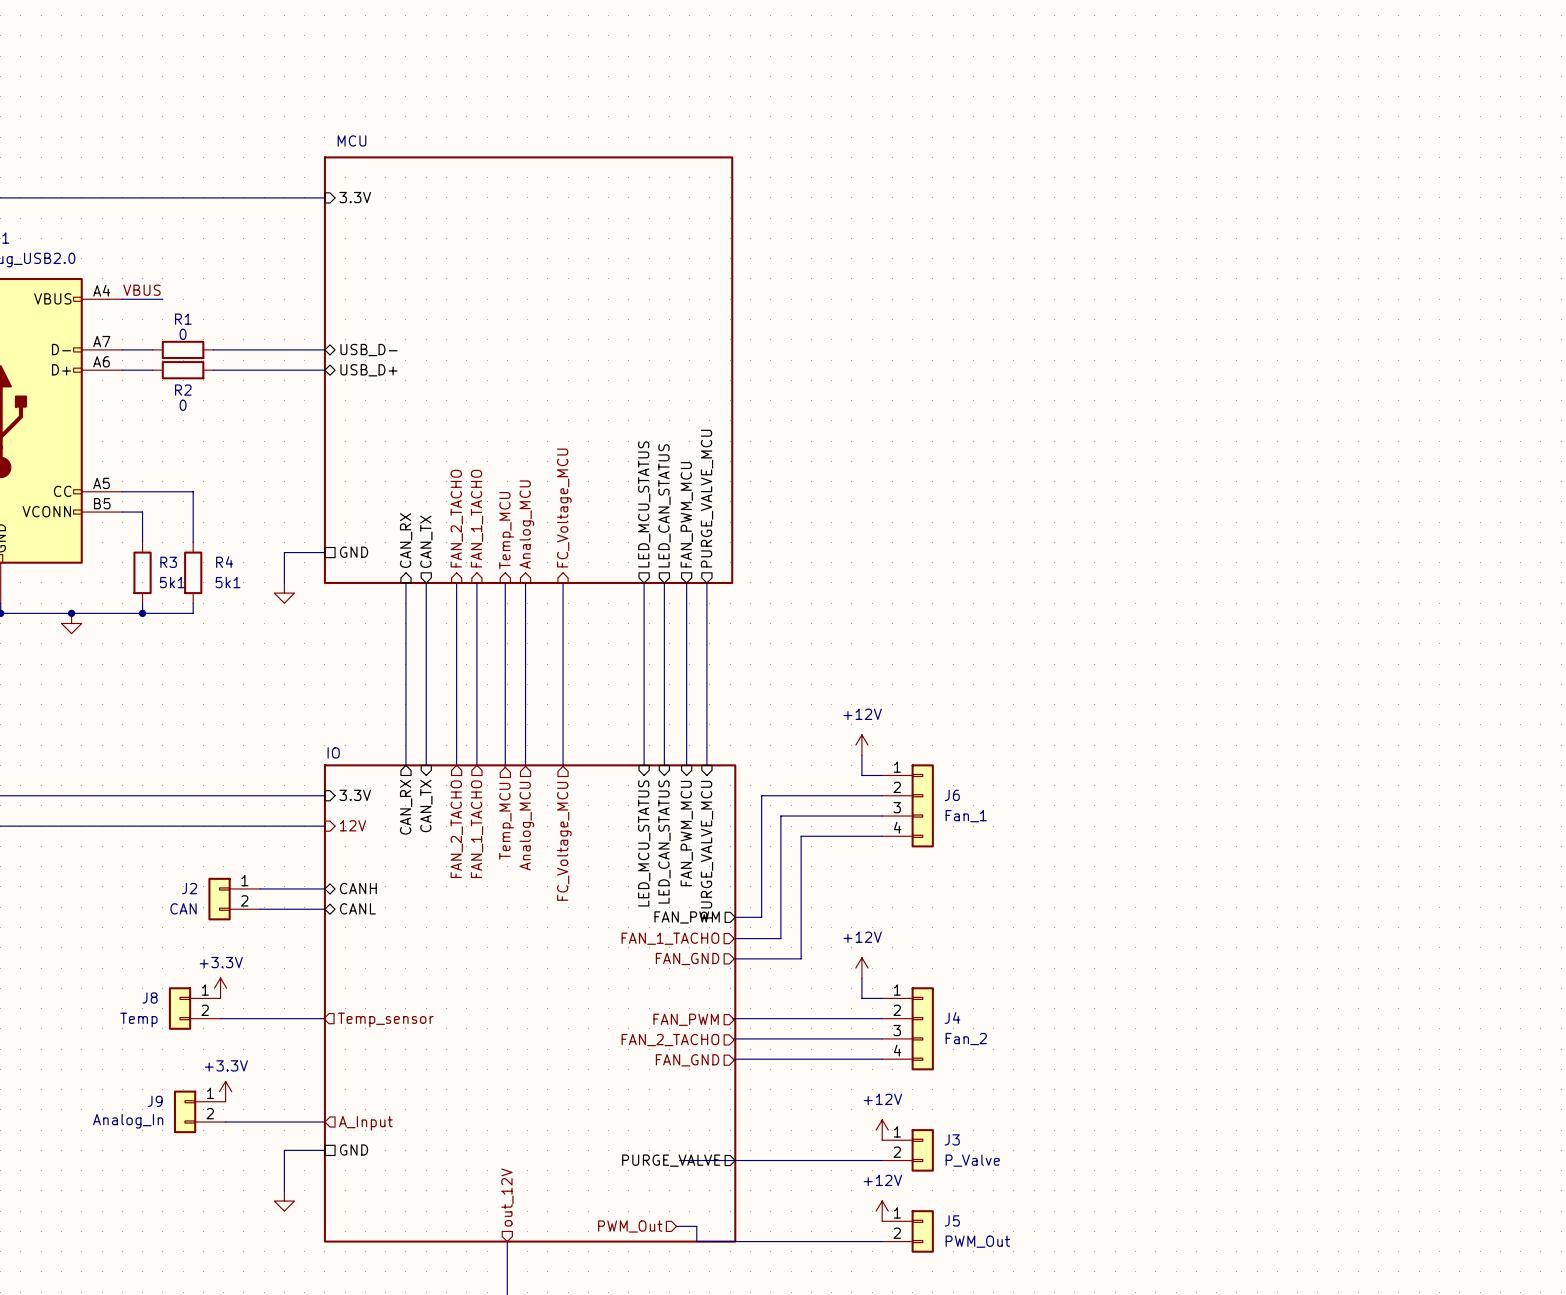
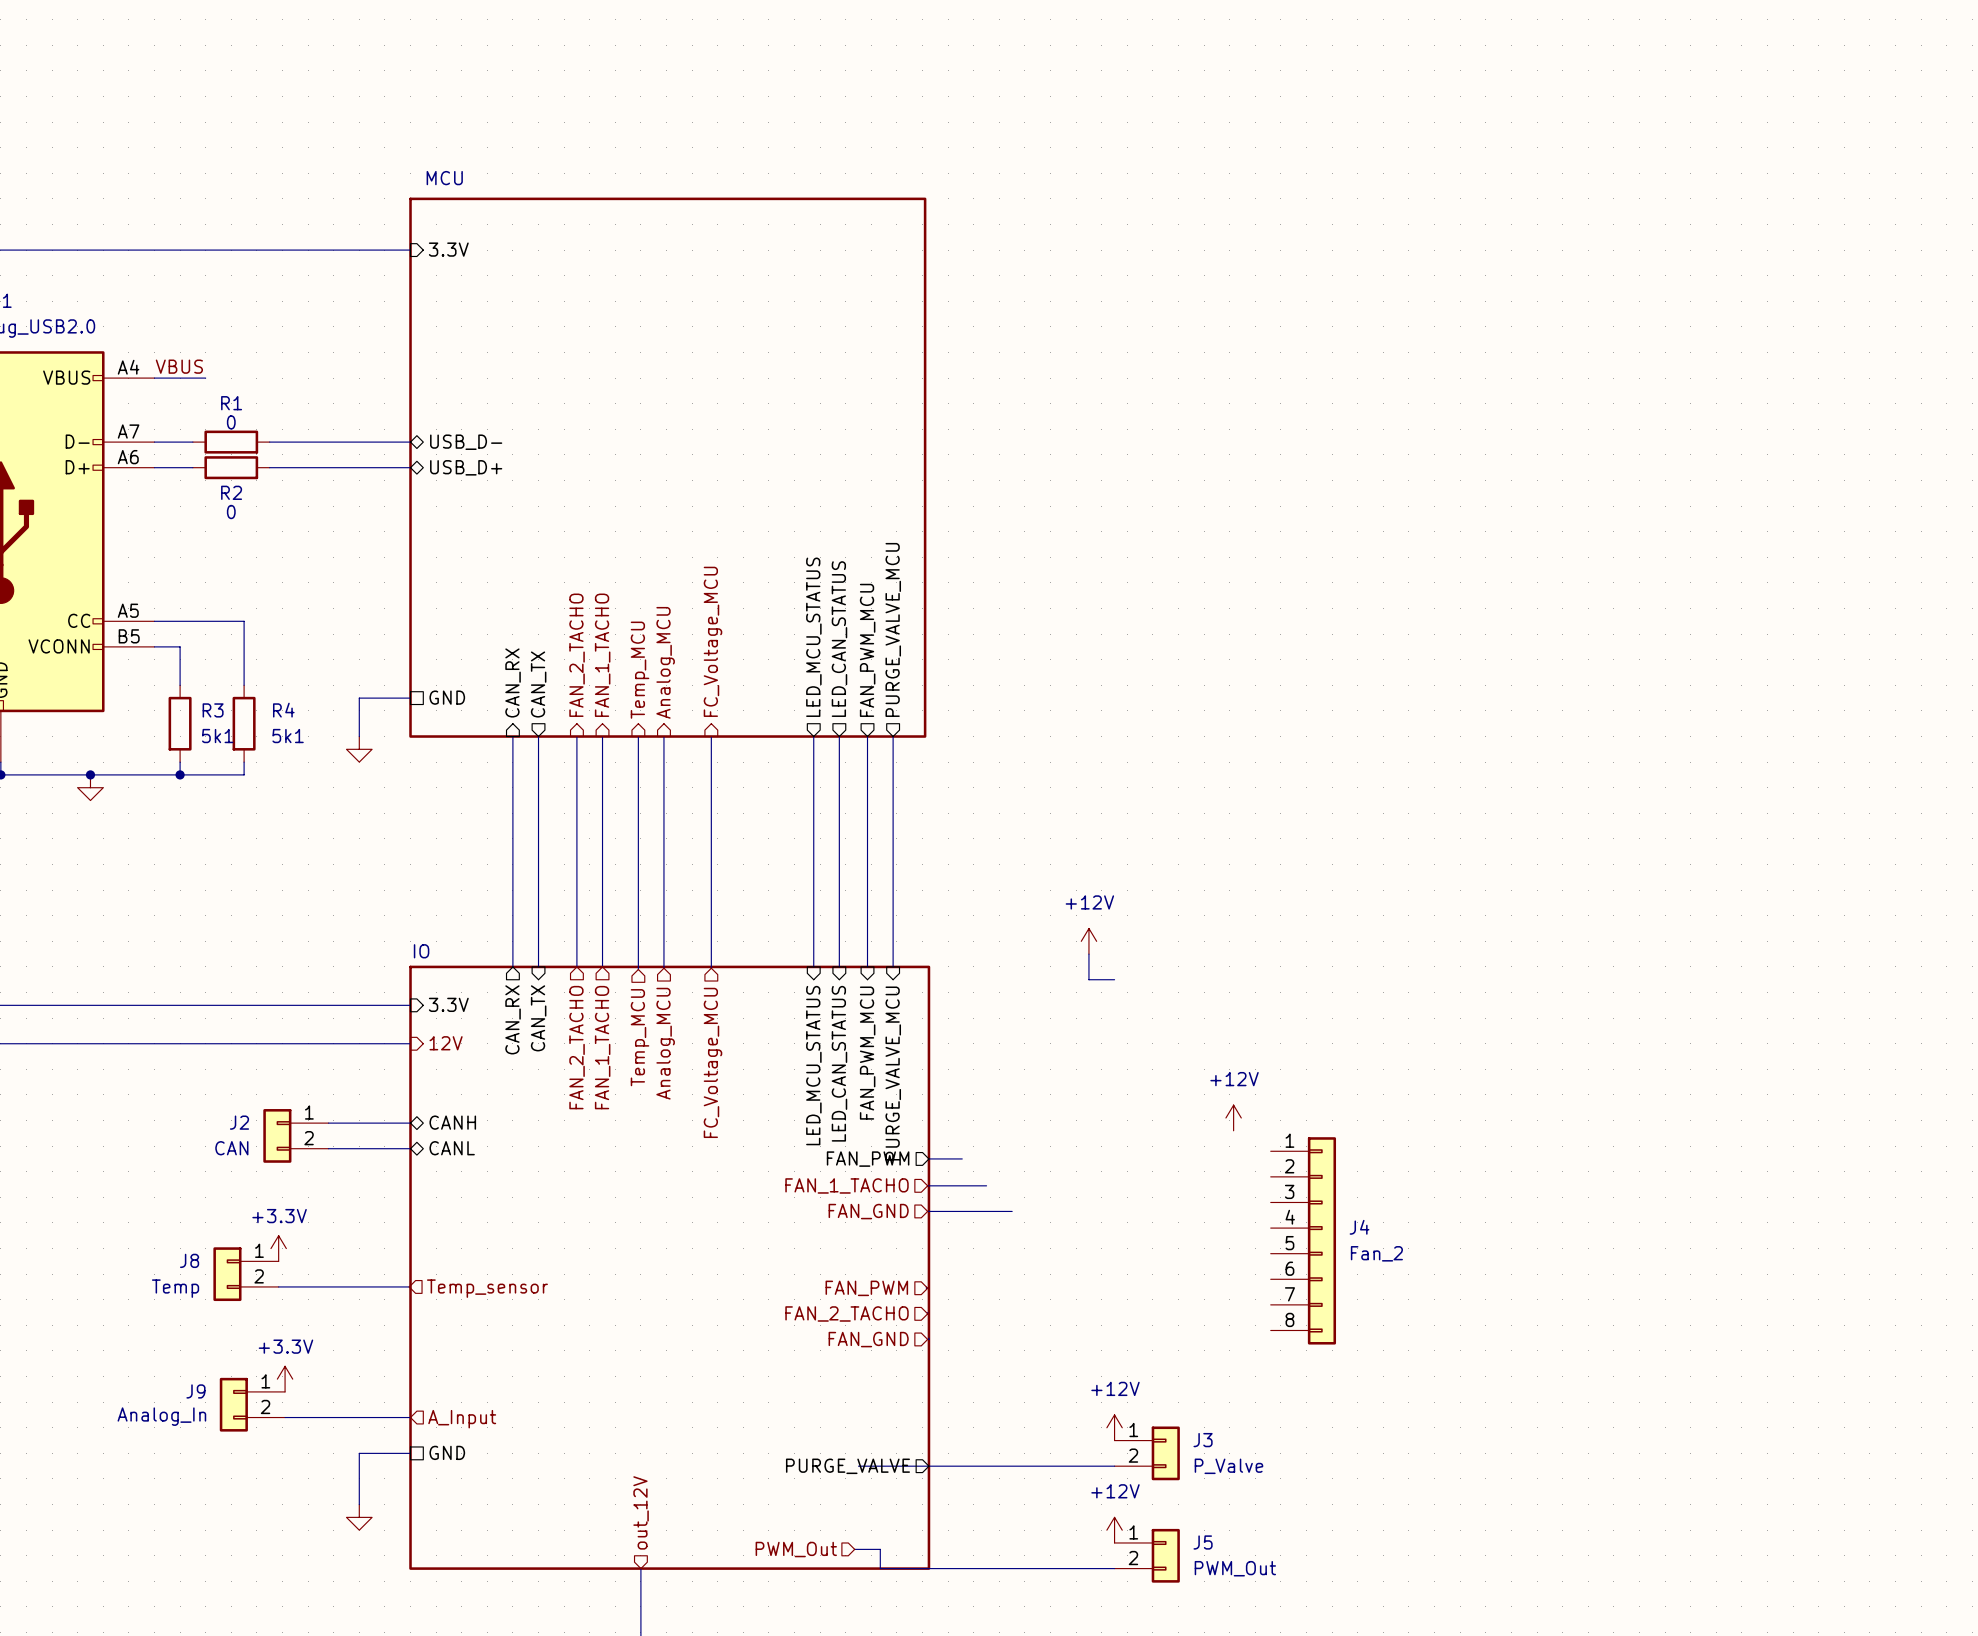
wire: (882, 795) (761, 795) (761, 917) -> none
J6: Fan_1 (908, 805) -> none
wire: (882, 816) (780, 816) (780, 938) -> none
wire: (882, 836) (801, 836) (801, 958) -> none
power symbol position: +12V (861, 968) -> +12V (1233, 1117)
wire: (861, 978) (861, 998) (882, 998) -> none
J4 symbol: [882, 987, 934, 1071] -> [1270, 1137, 1337, 1345]
wire: (733, 1018) (882, 1018) -> none
wire: (734, 1038) (882, 1038) -> none
wire: (735, 1059) (882, 1059) -> none

